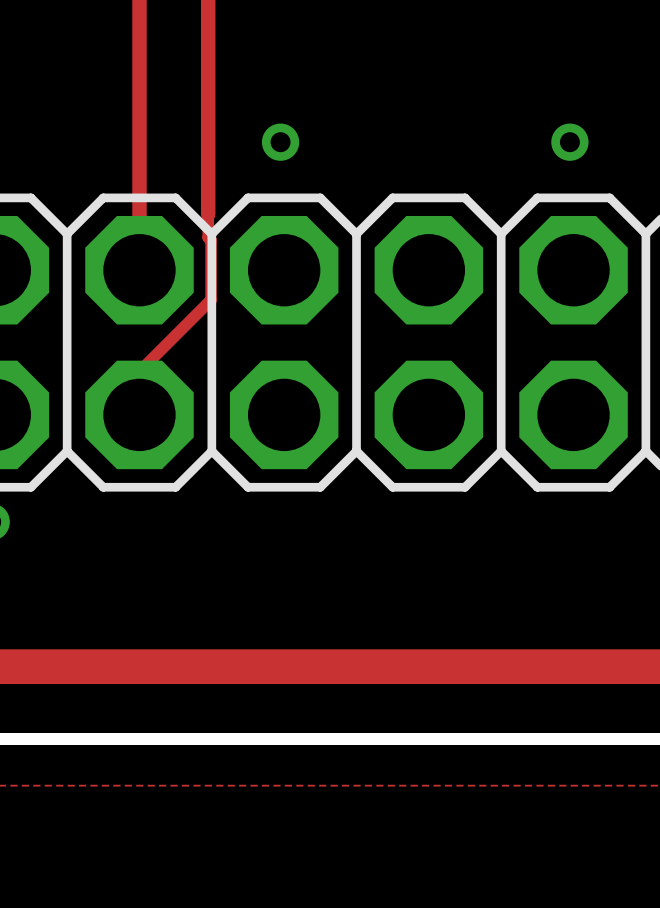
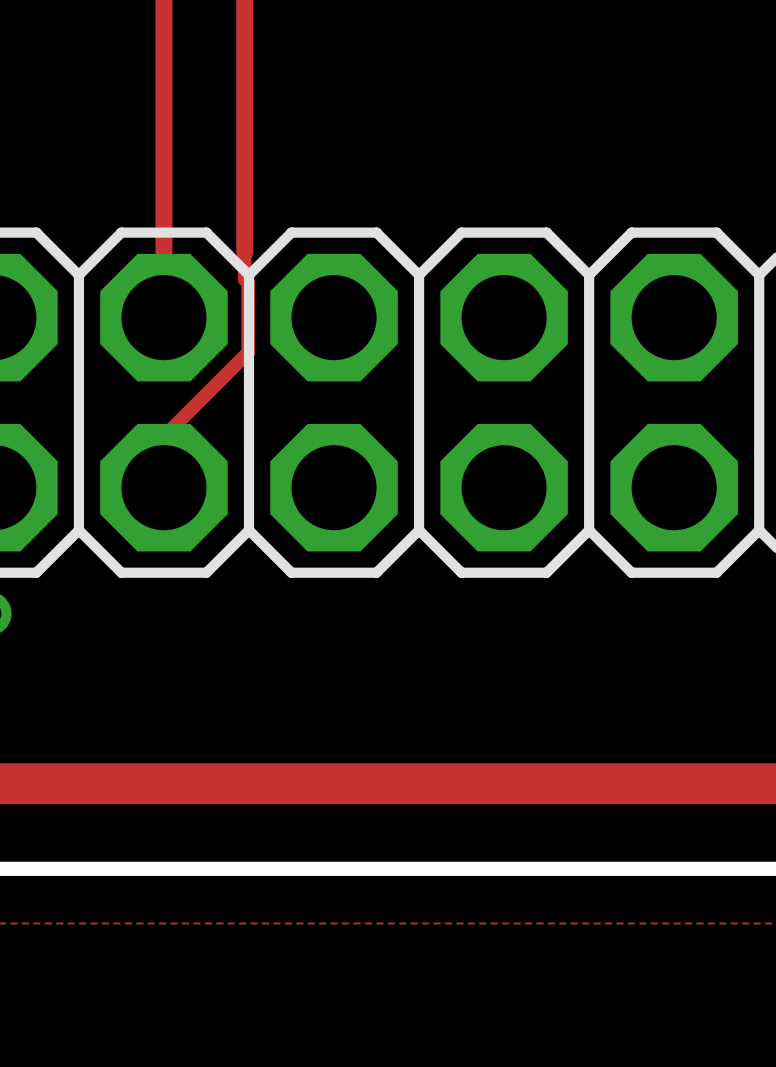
via: (280, 142) -> none
via: (569, 142) -> none

